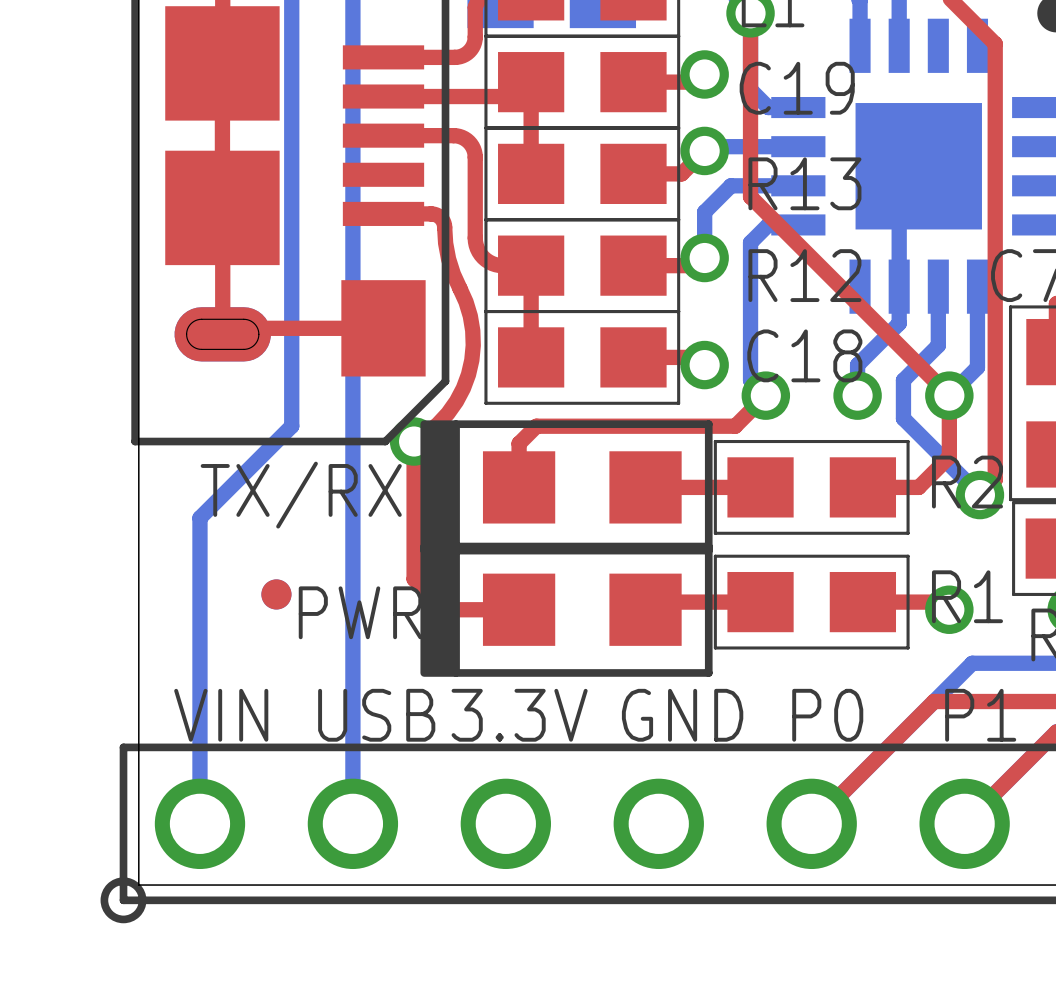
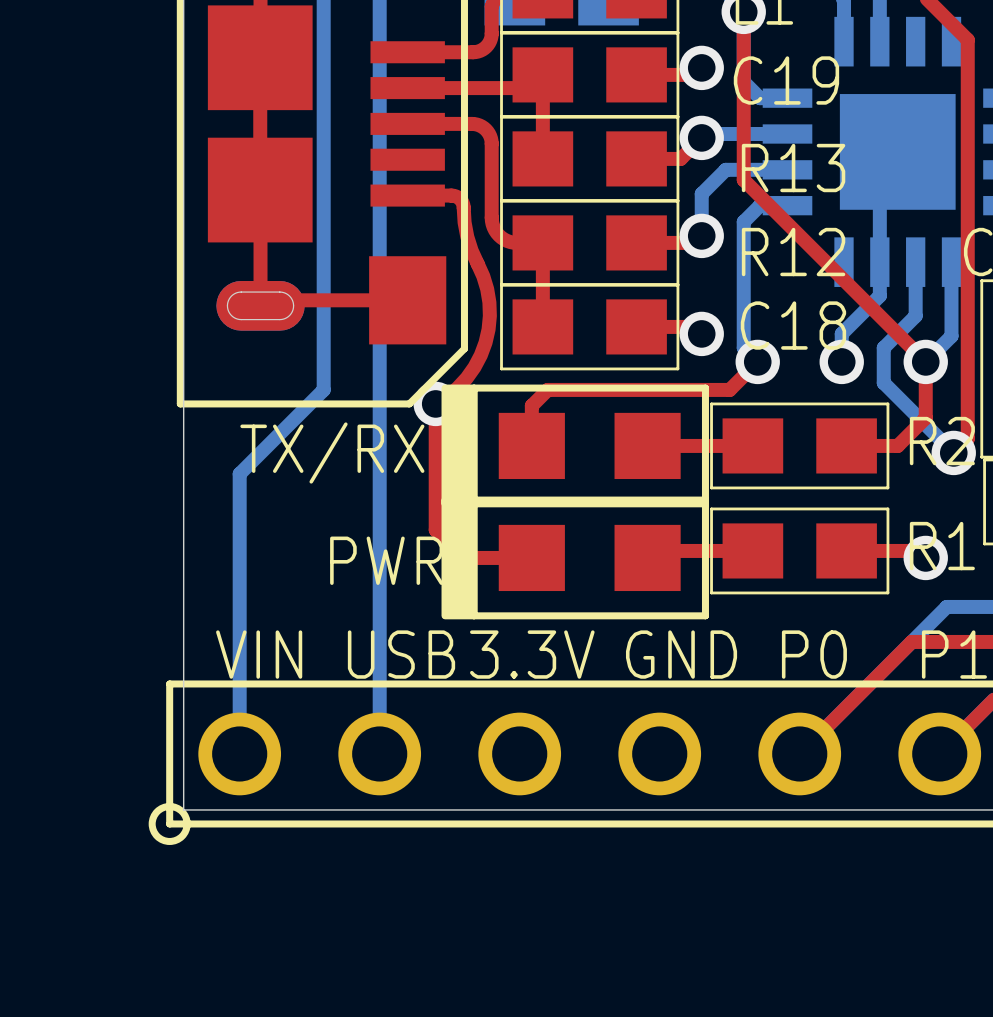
part: (276, 594) -> none

